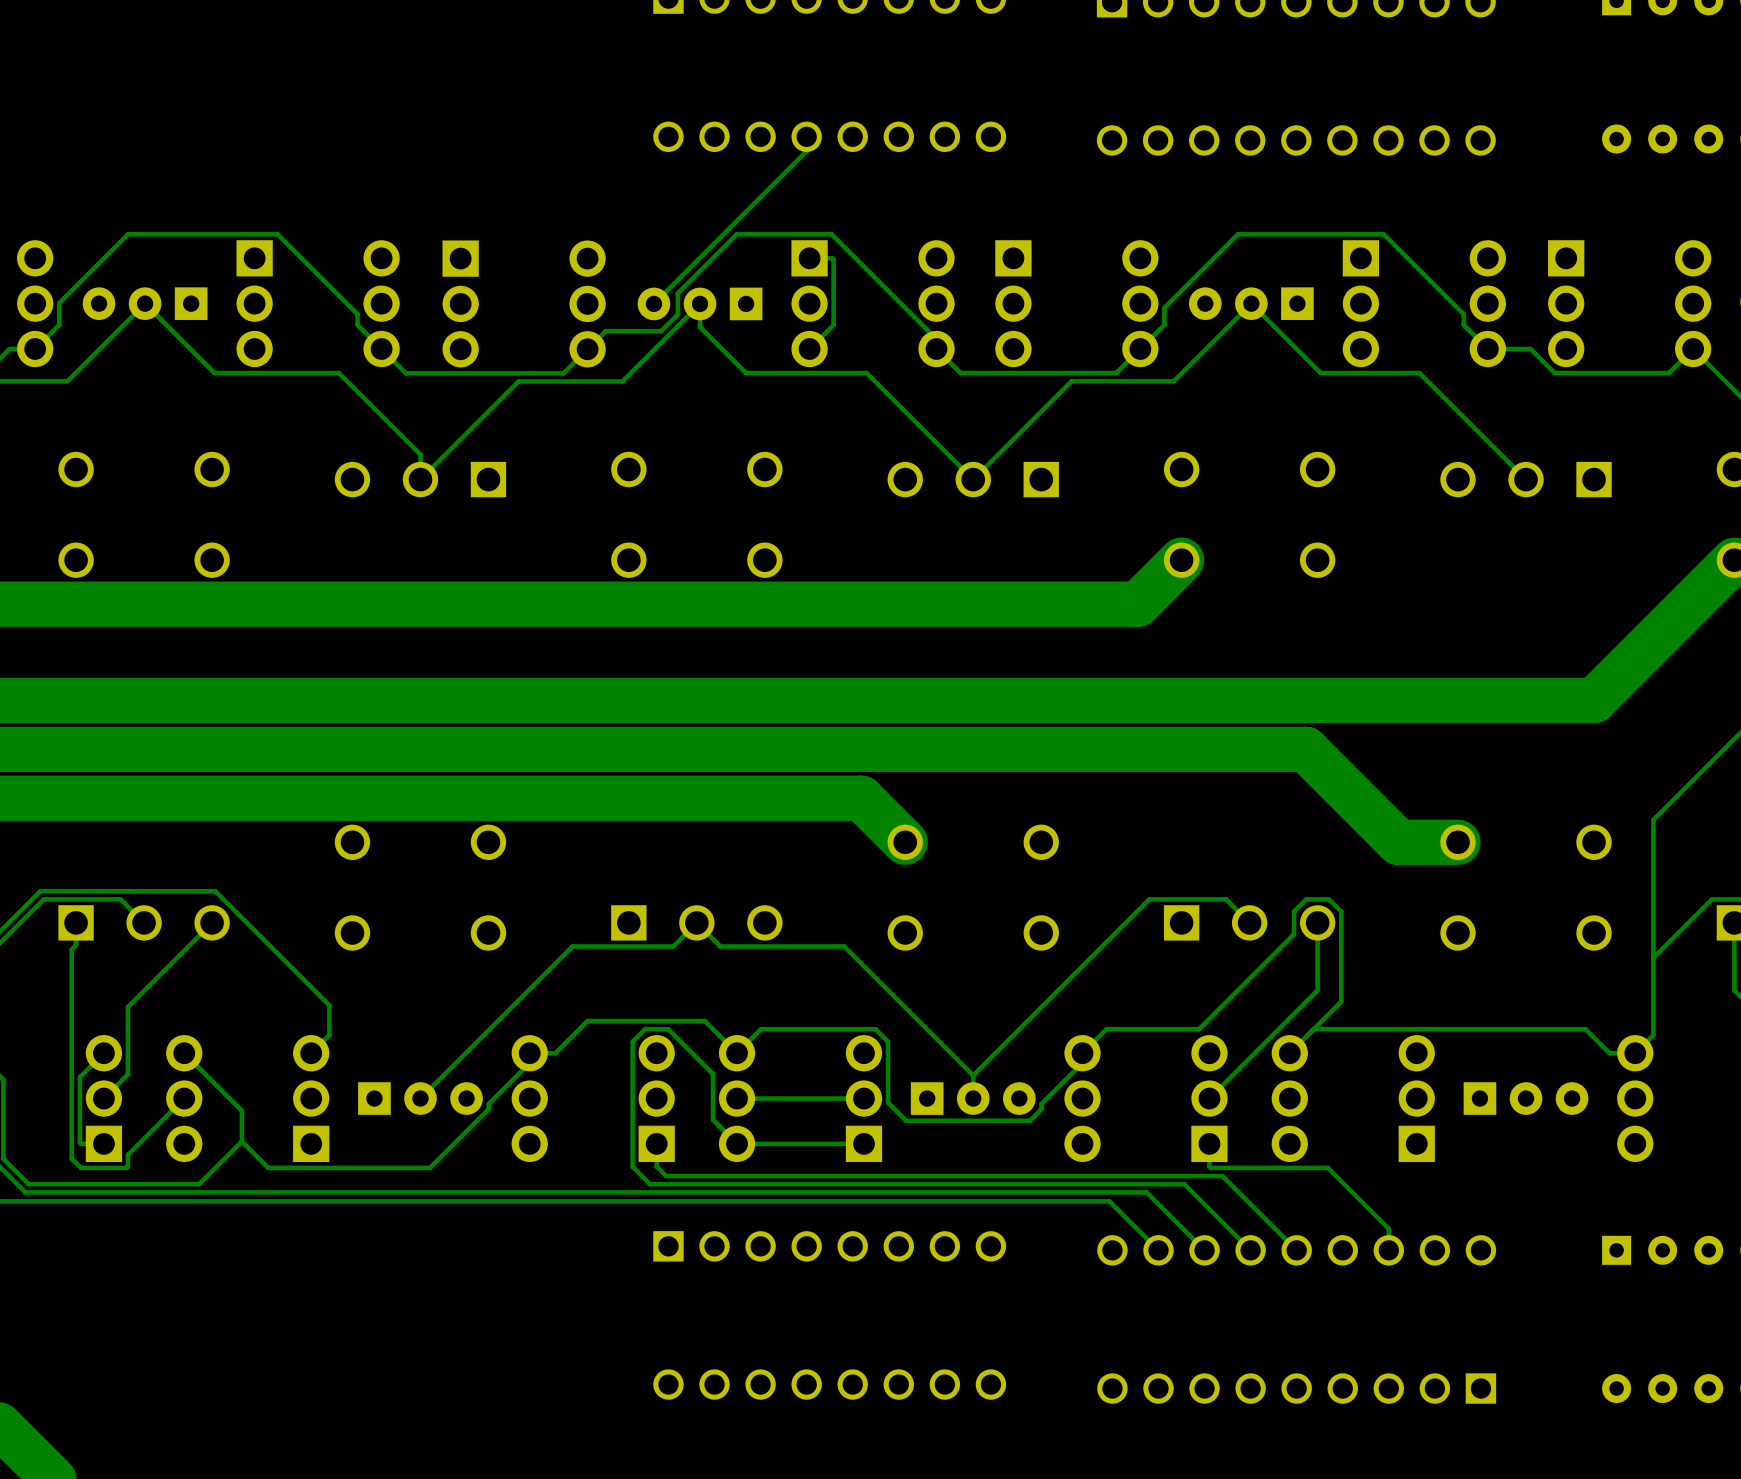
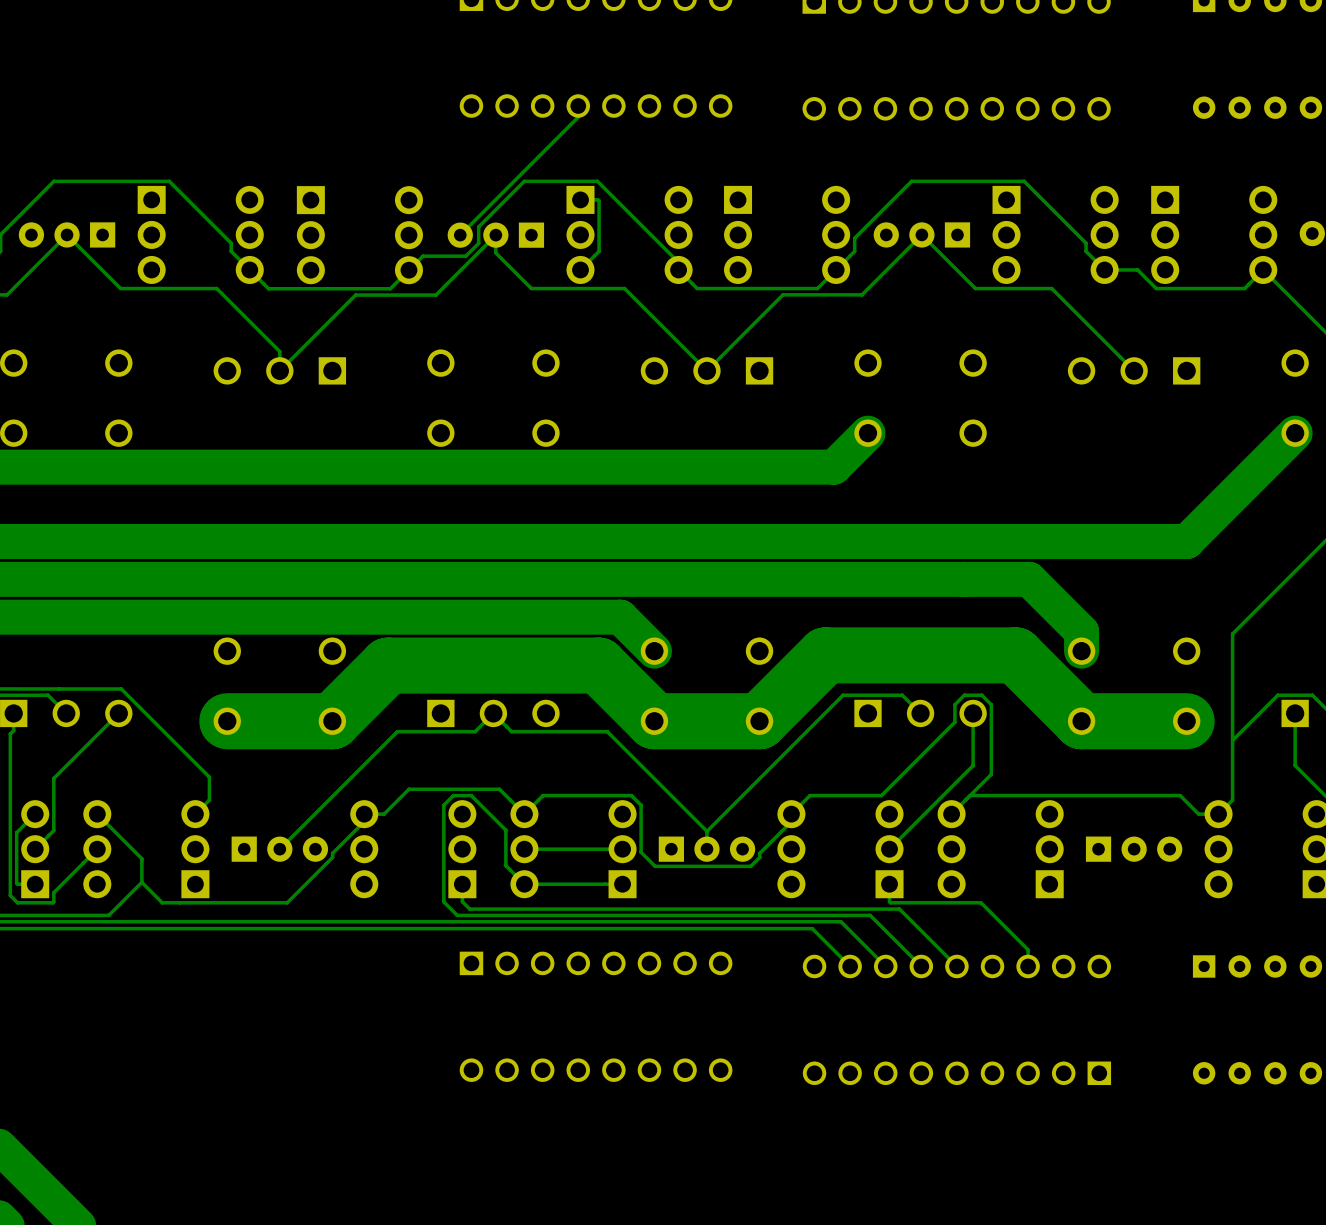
track: (1305, 749) (1398, 842) (1458, 842) -> (963, 579) (1029, 579) (1081, 631) (1081, 651)
track: none -> (1186, 721) (1081, 721) (1015, 655) (825, 655) (759, 721) (654, 721) (598, 665) (388, 665) (332, 721) (227, 721)

